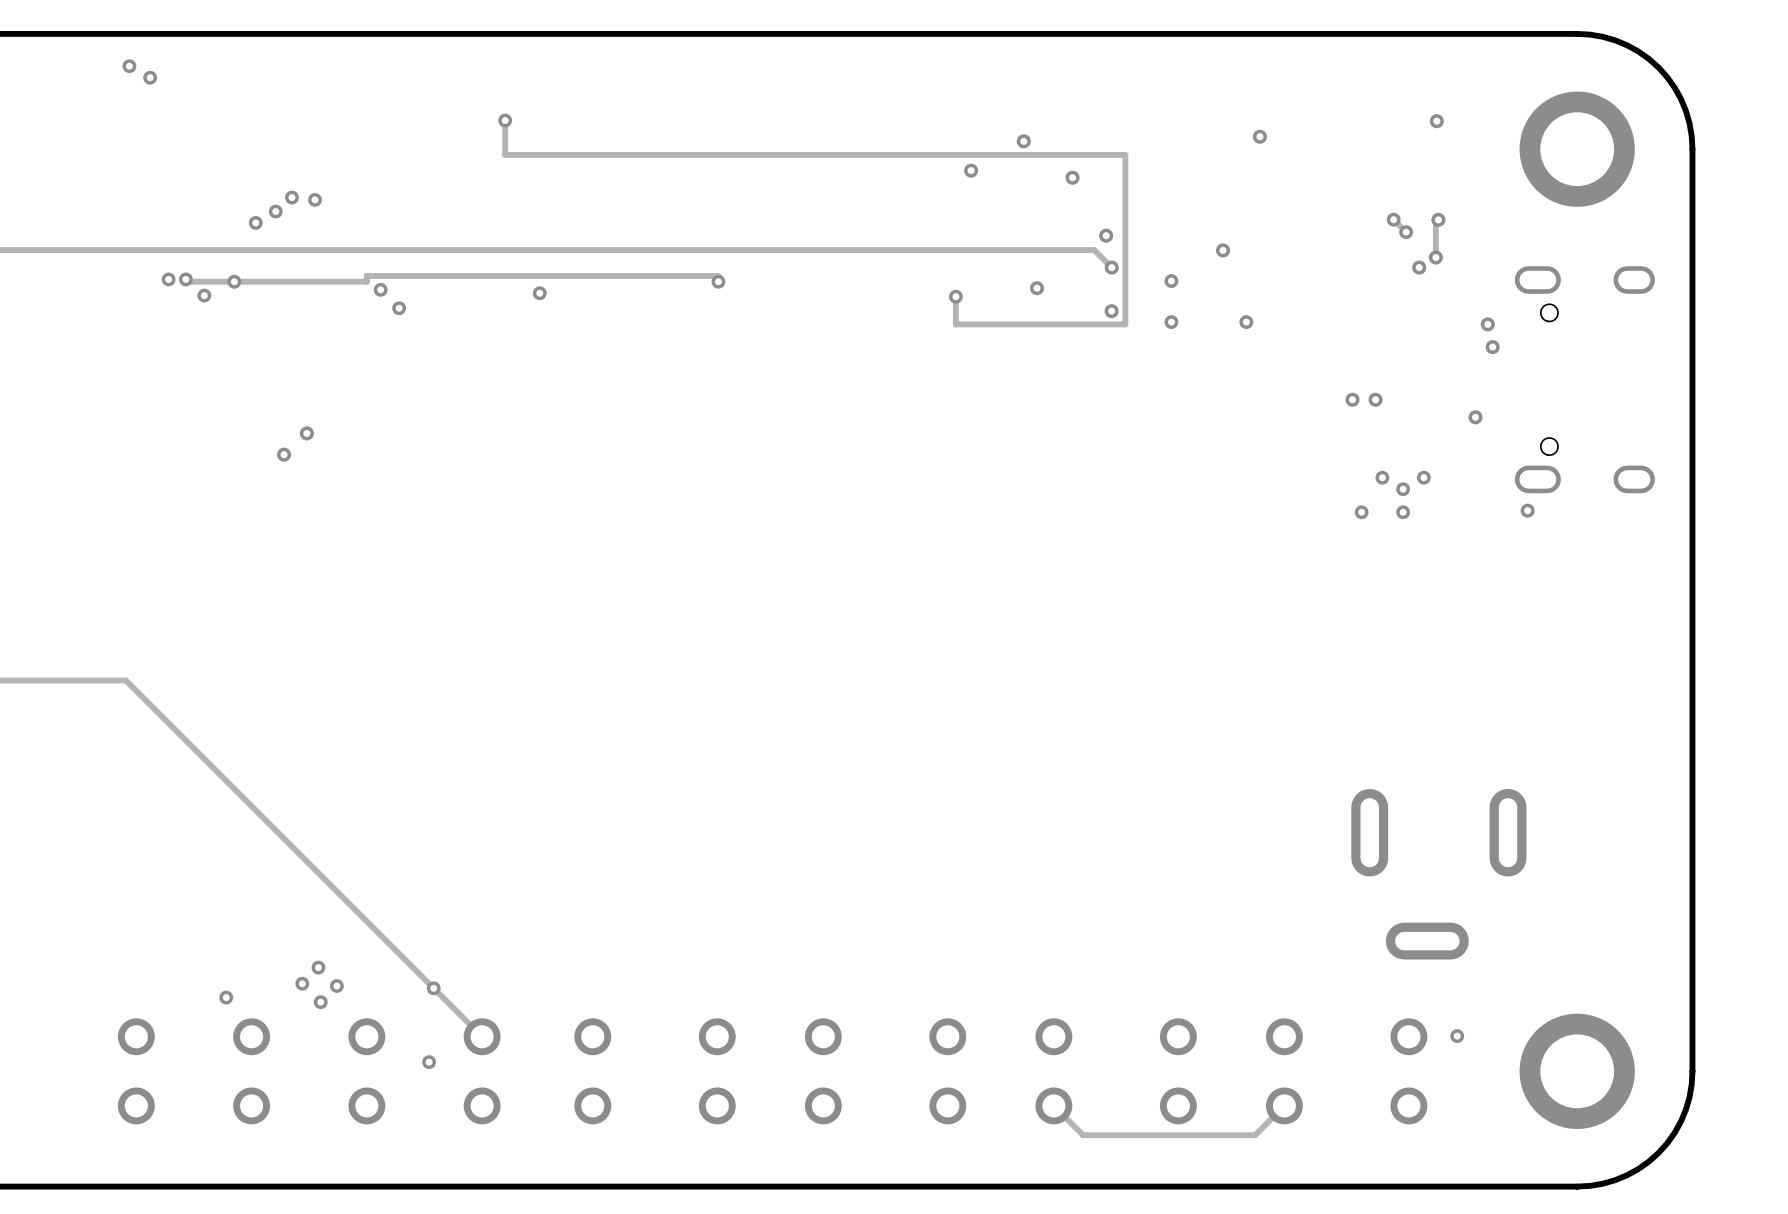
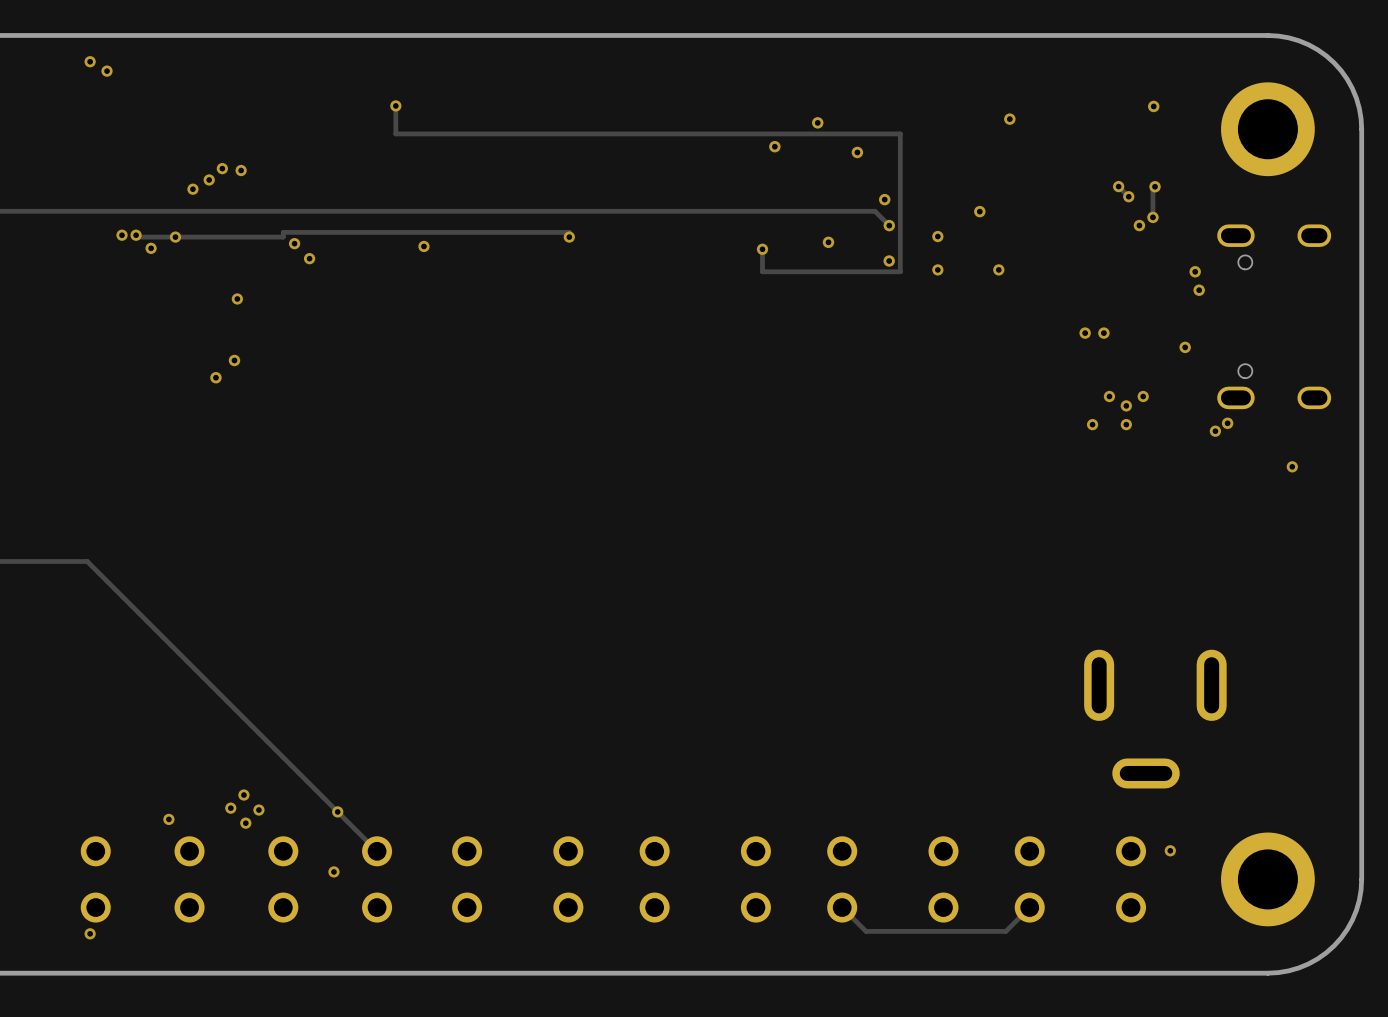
via: none -> (237, 298)
via: none -> (1215, 431)
via: none -> (1292, 466)
via: none -> (90, 933)

